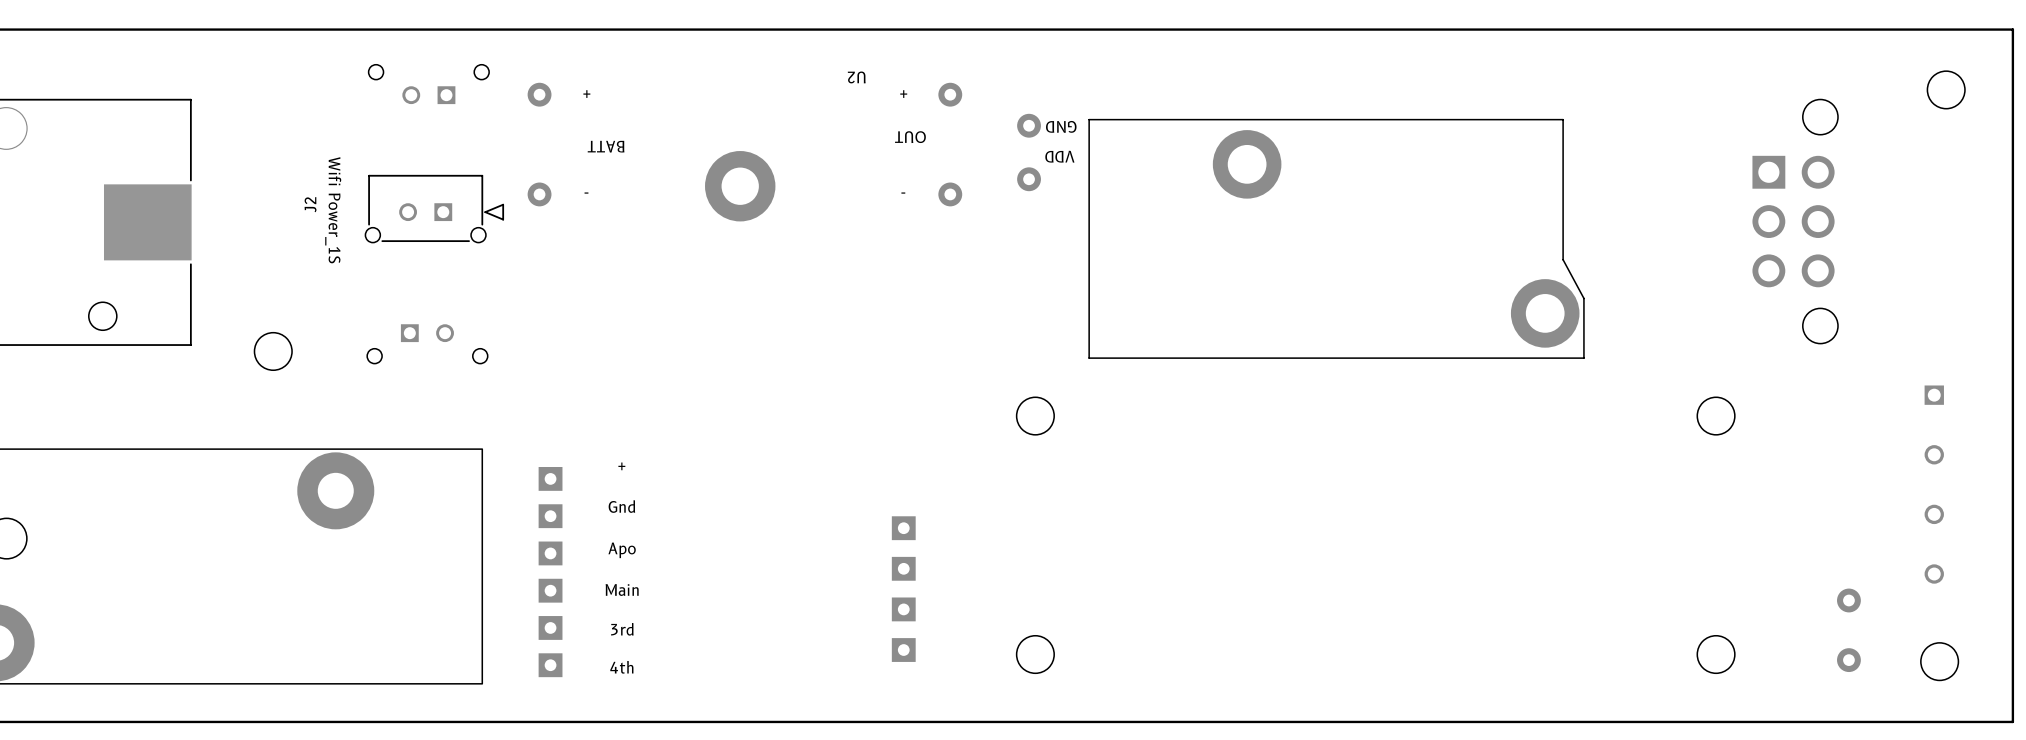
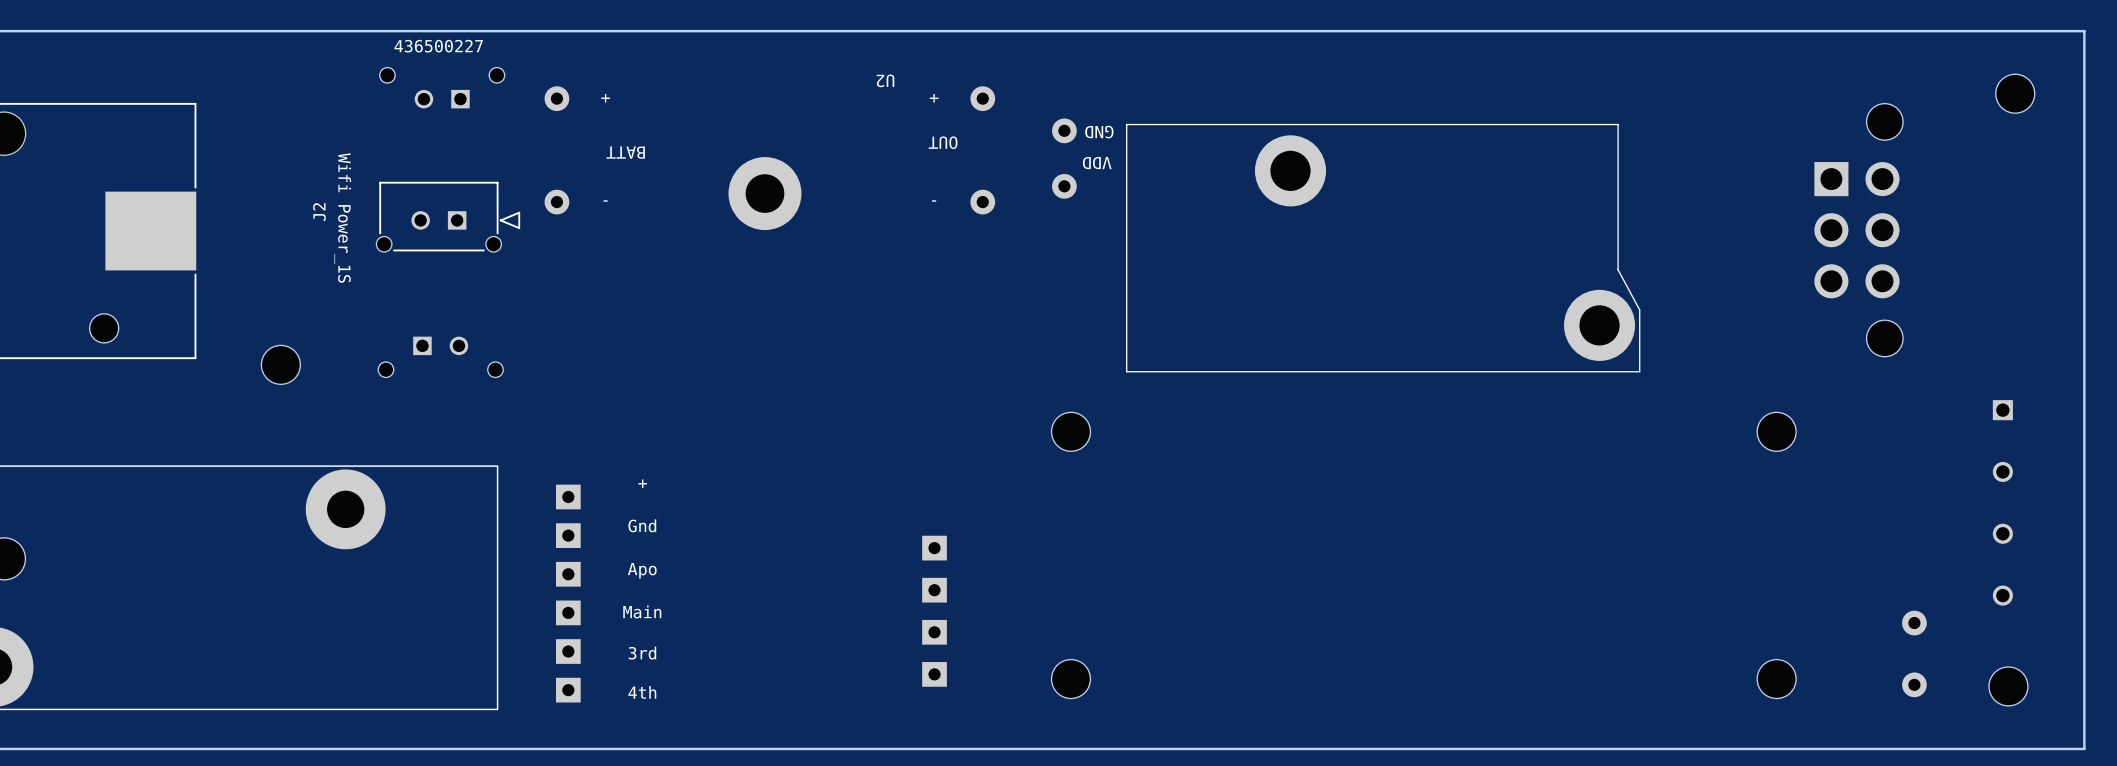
J2 text: none -> 436500227 (438, 46)

